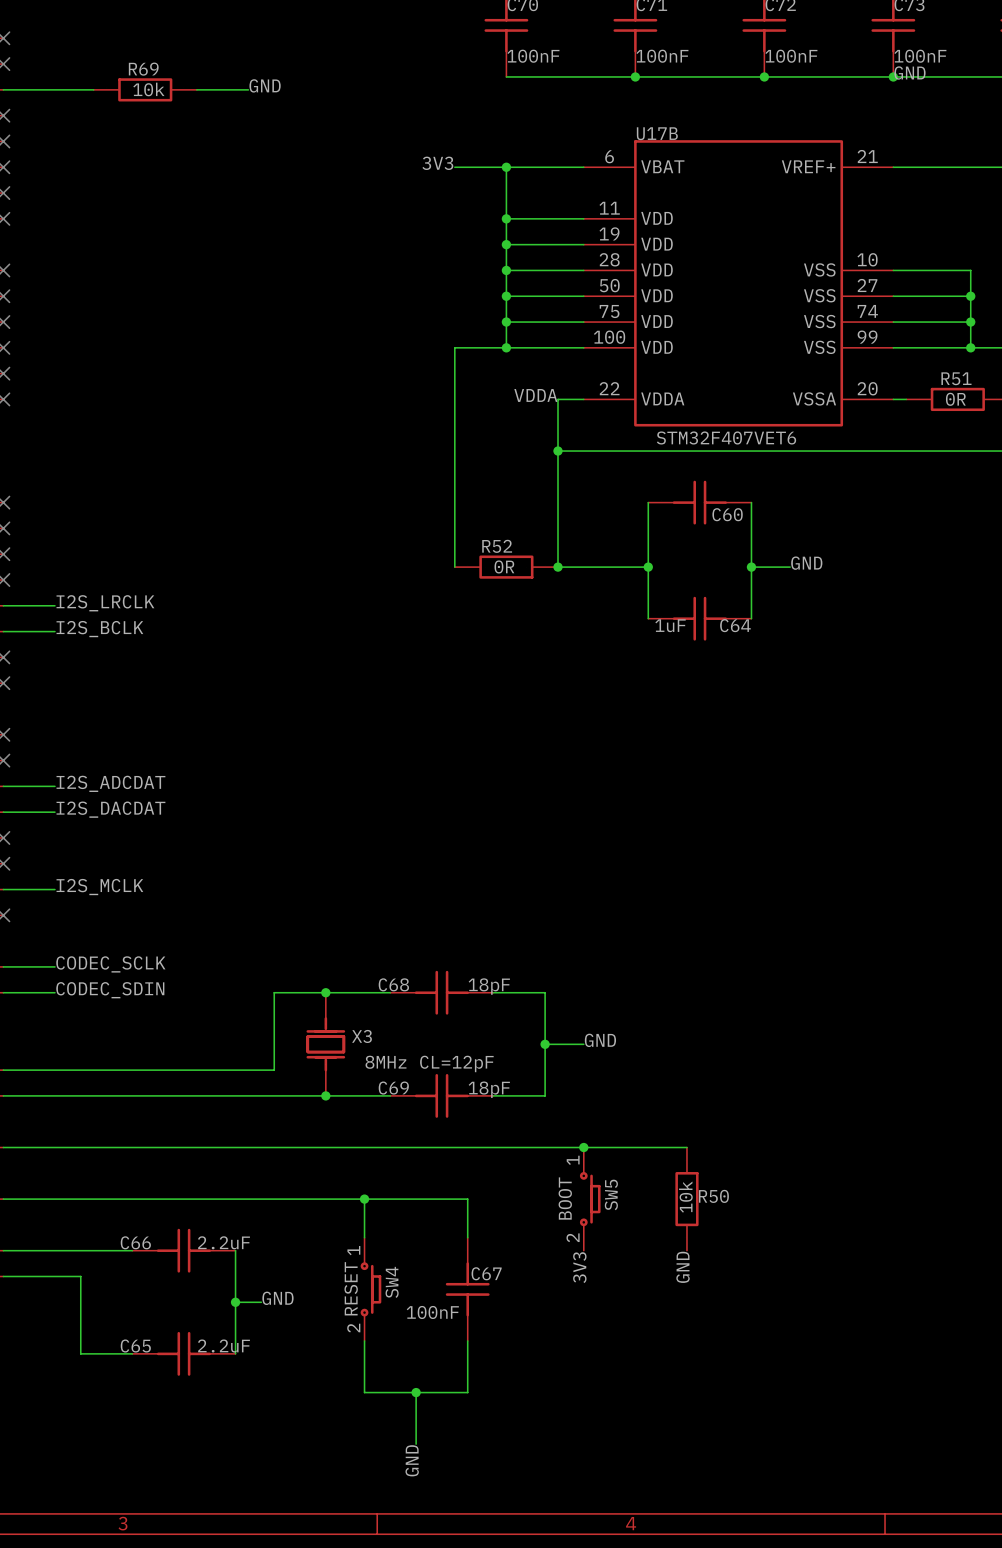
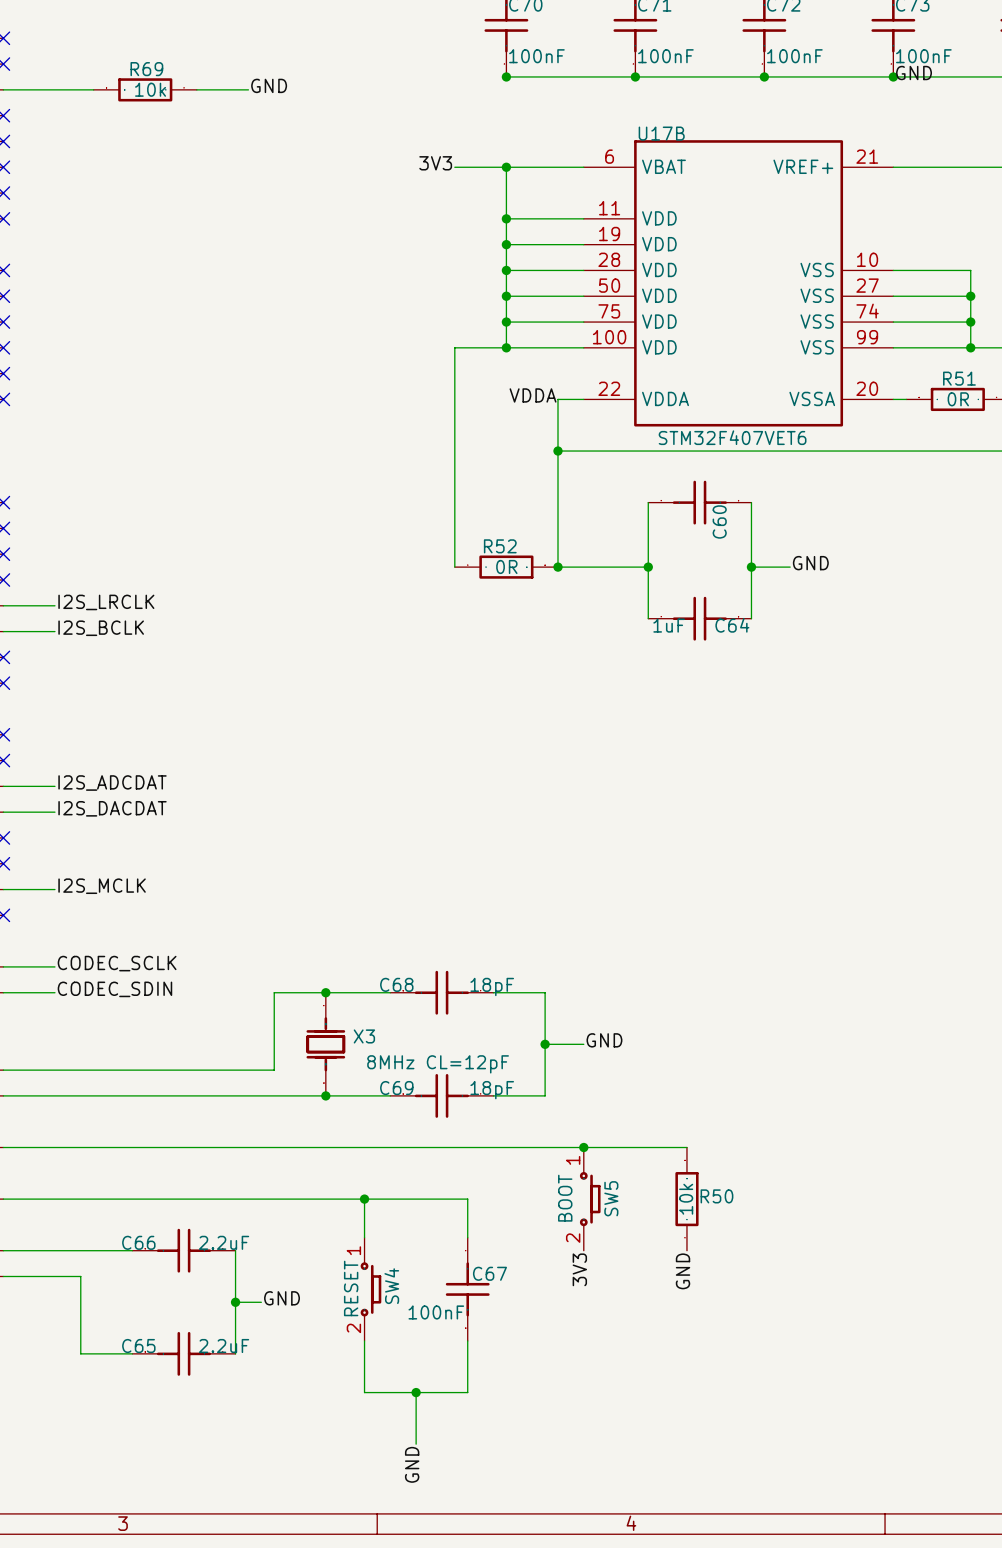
junction: none -> (506, 76)
C60 name rotation: 0° (727, 514) -> 90° counterclockwise (719, 521)

